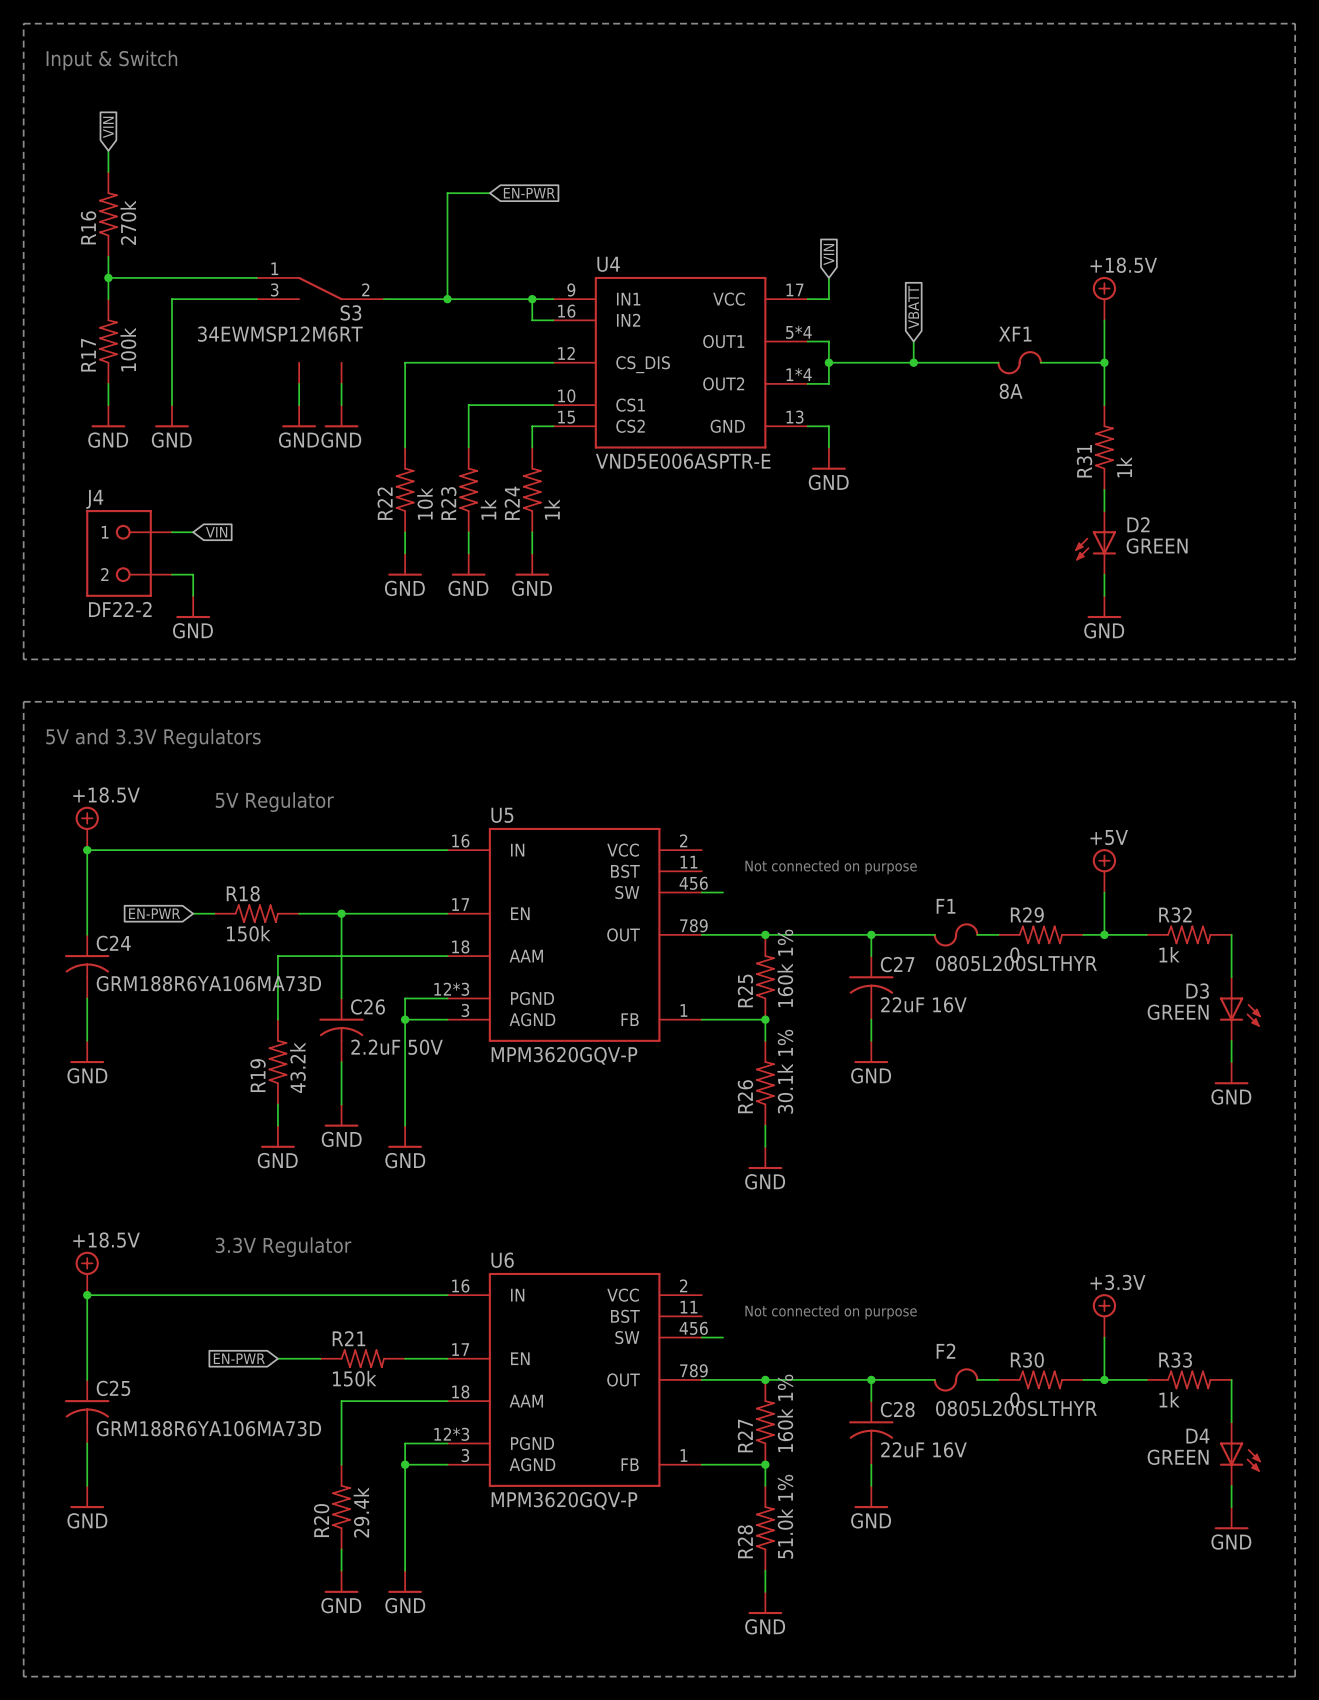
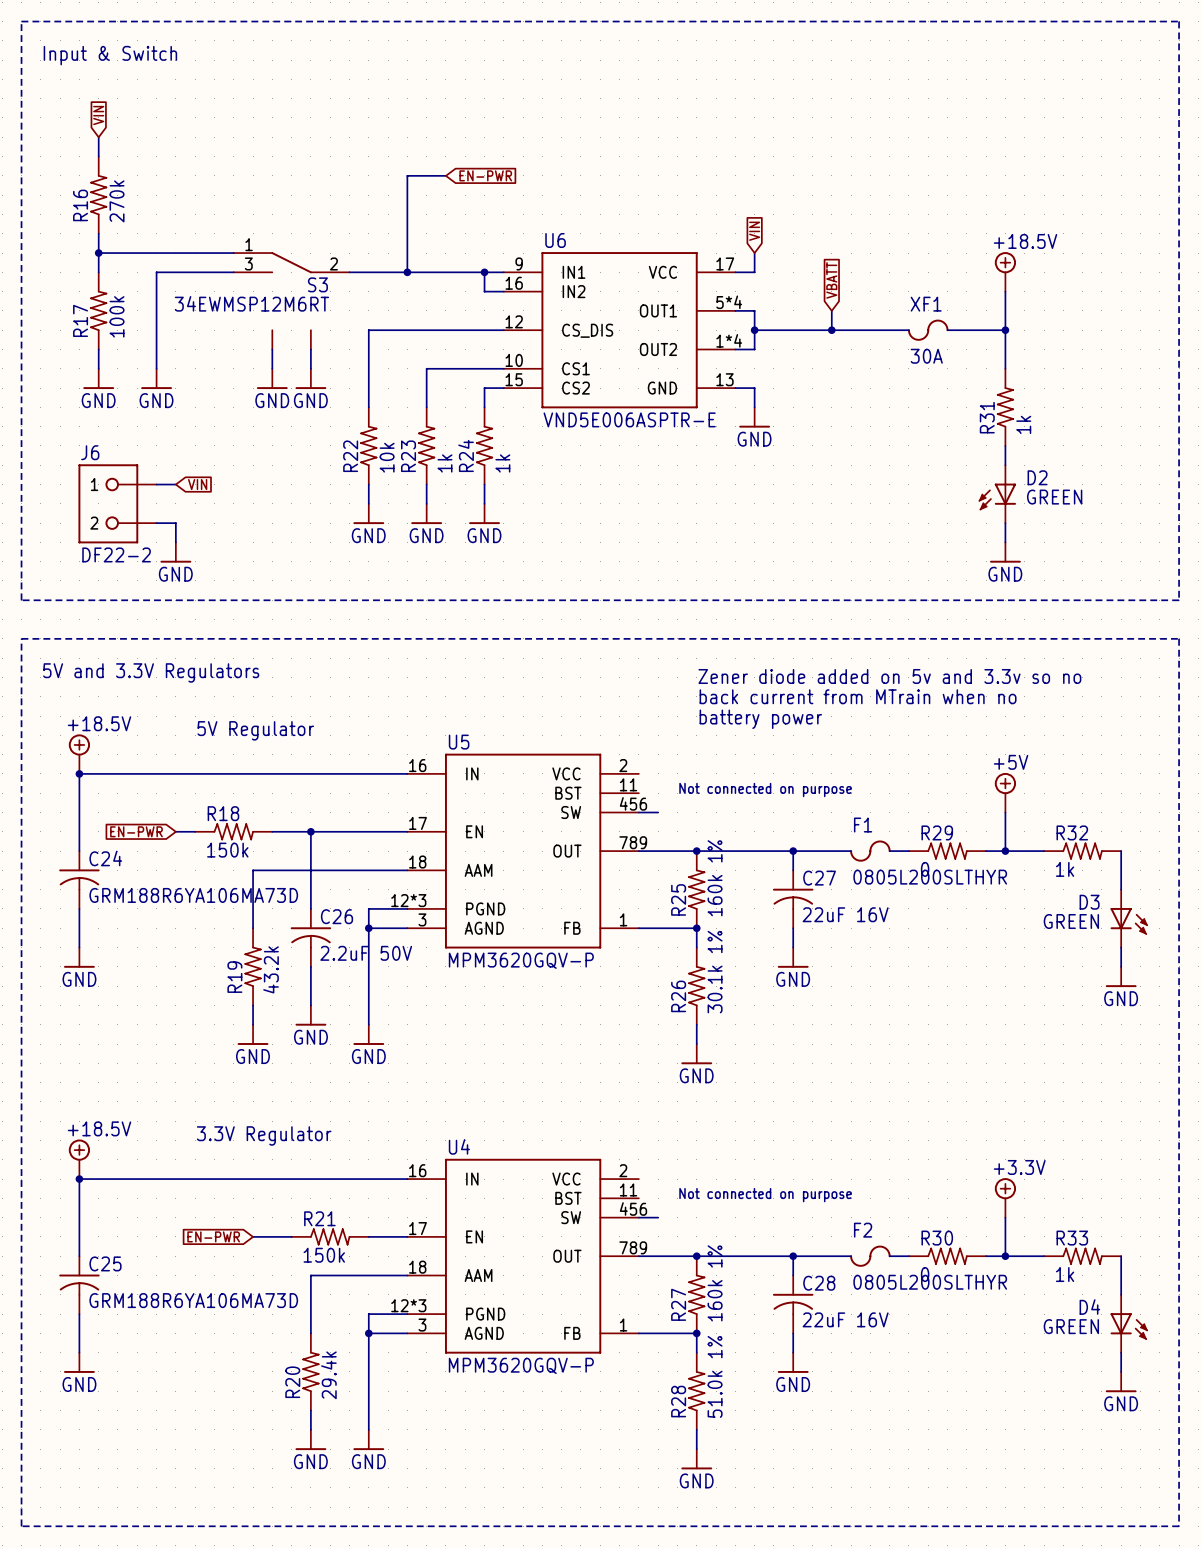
U4 name: U4 (608, 264) -> U6 (555, 240)
XF1 value: 8A (1011, 391) -> 30A (926, 356)
J4 name: J4 (94, 499) -> J6 (90, 452)
text: none -> Zener diode added on 5v and 3.3v so no (889, 676)
text: none -> back current from MTrain when no (858, 696)
text: none -> battery power (760, 719)
U6 name: U6 (502, 1260) -> U4 (459, 1146)

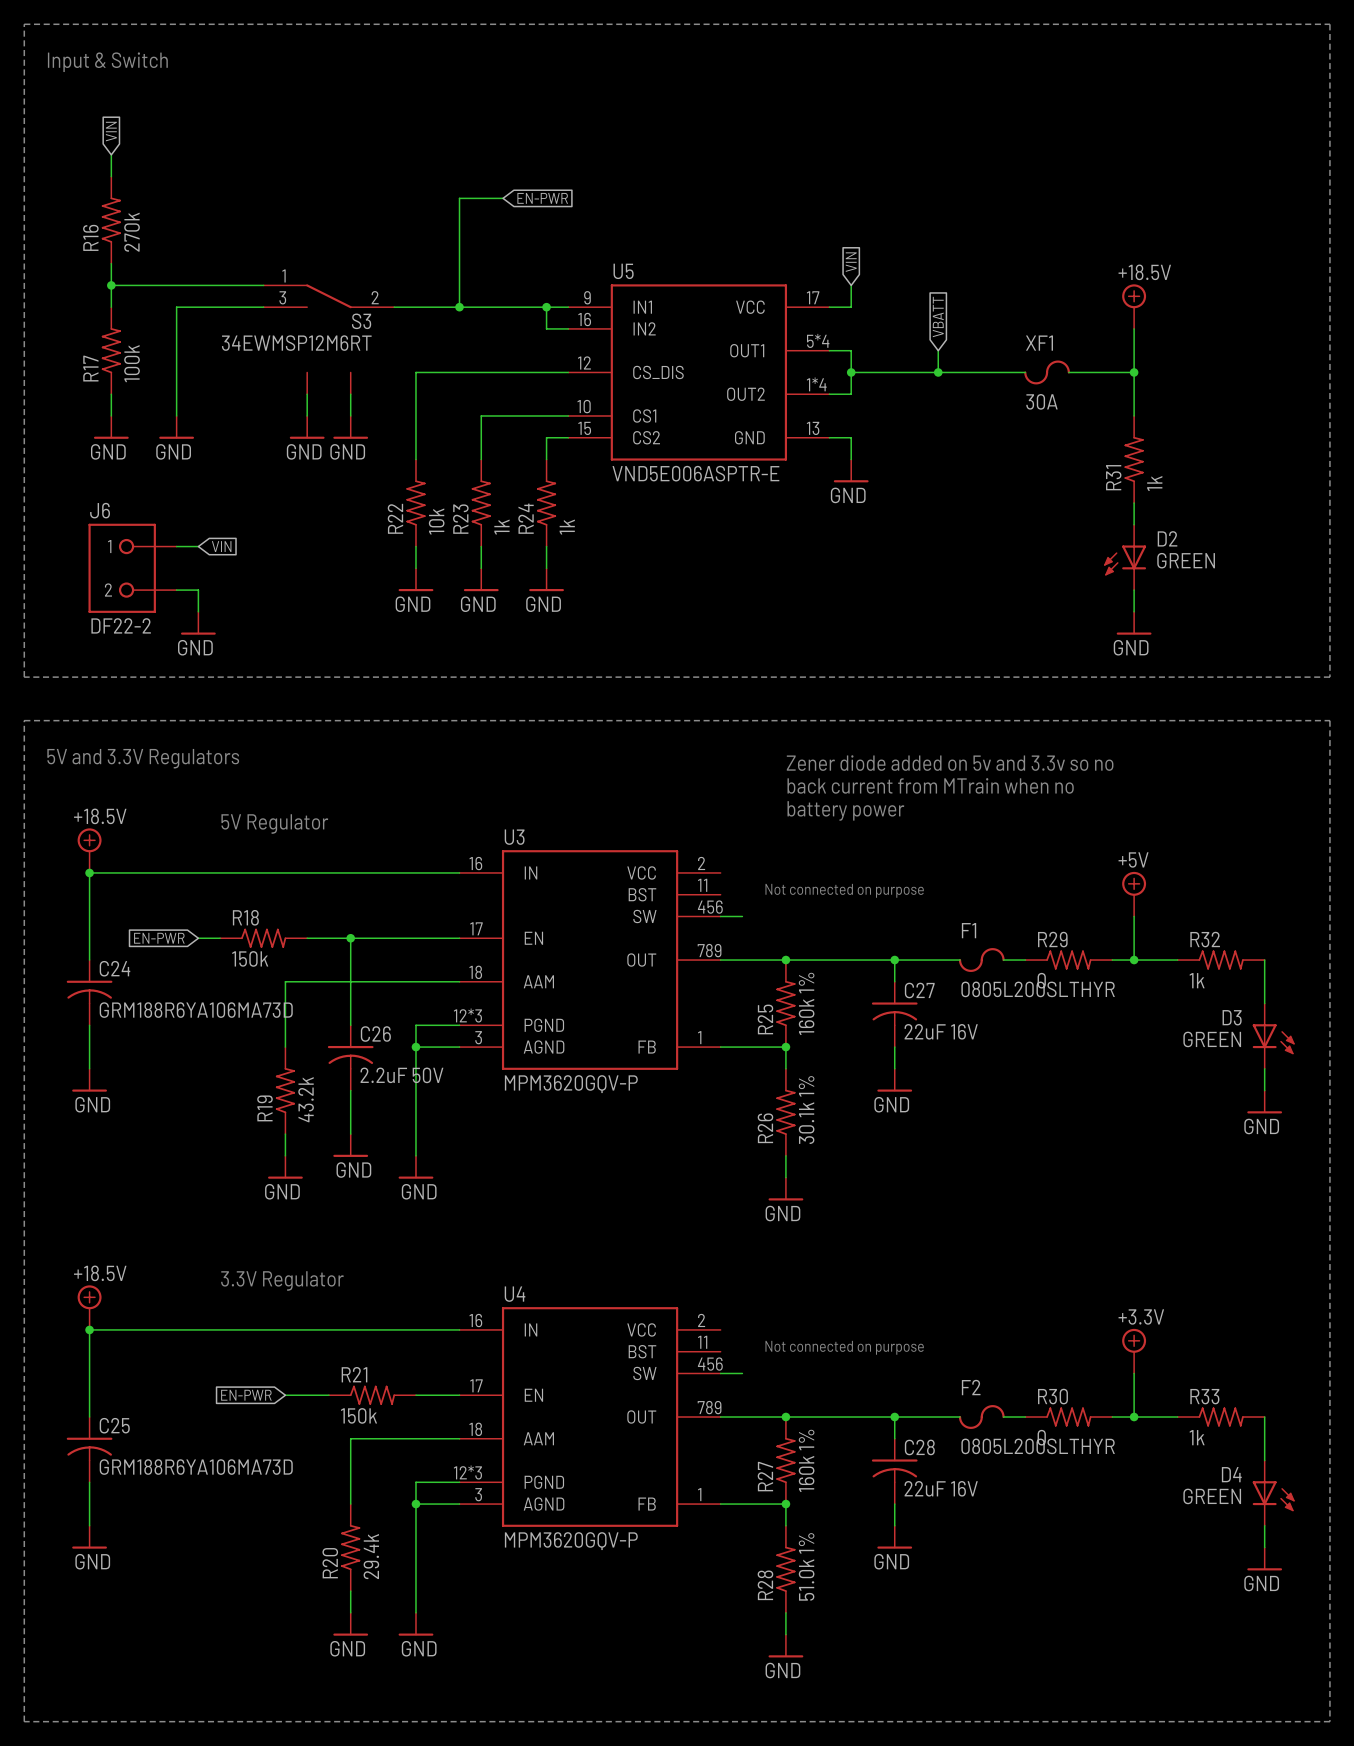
U6 name: U6 (555, 240) -> U5 (623, 271)
U5 name: U5 (459, 742) -> U3 (514, 837)

